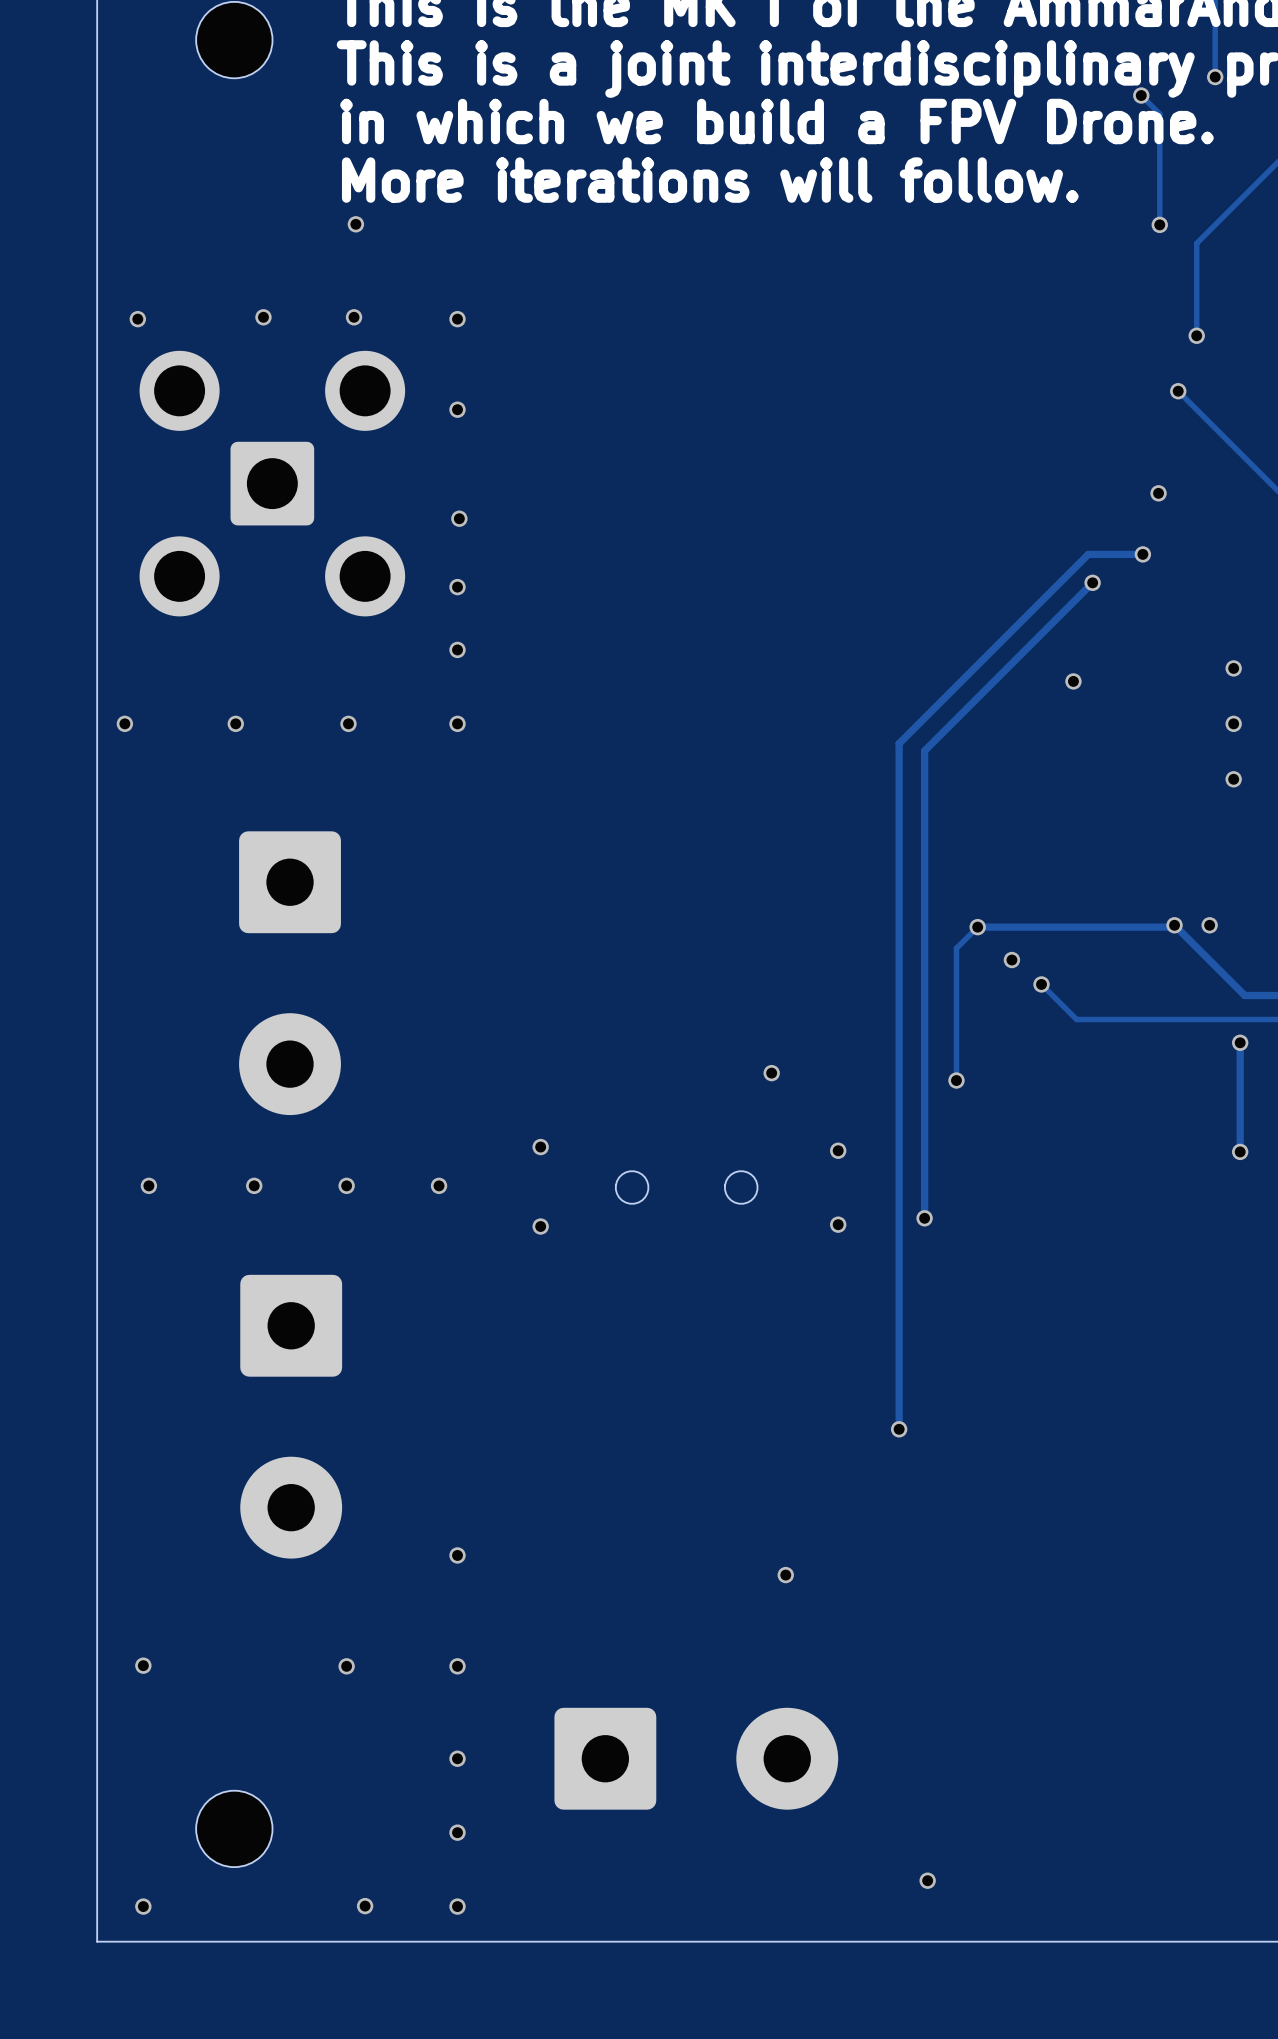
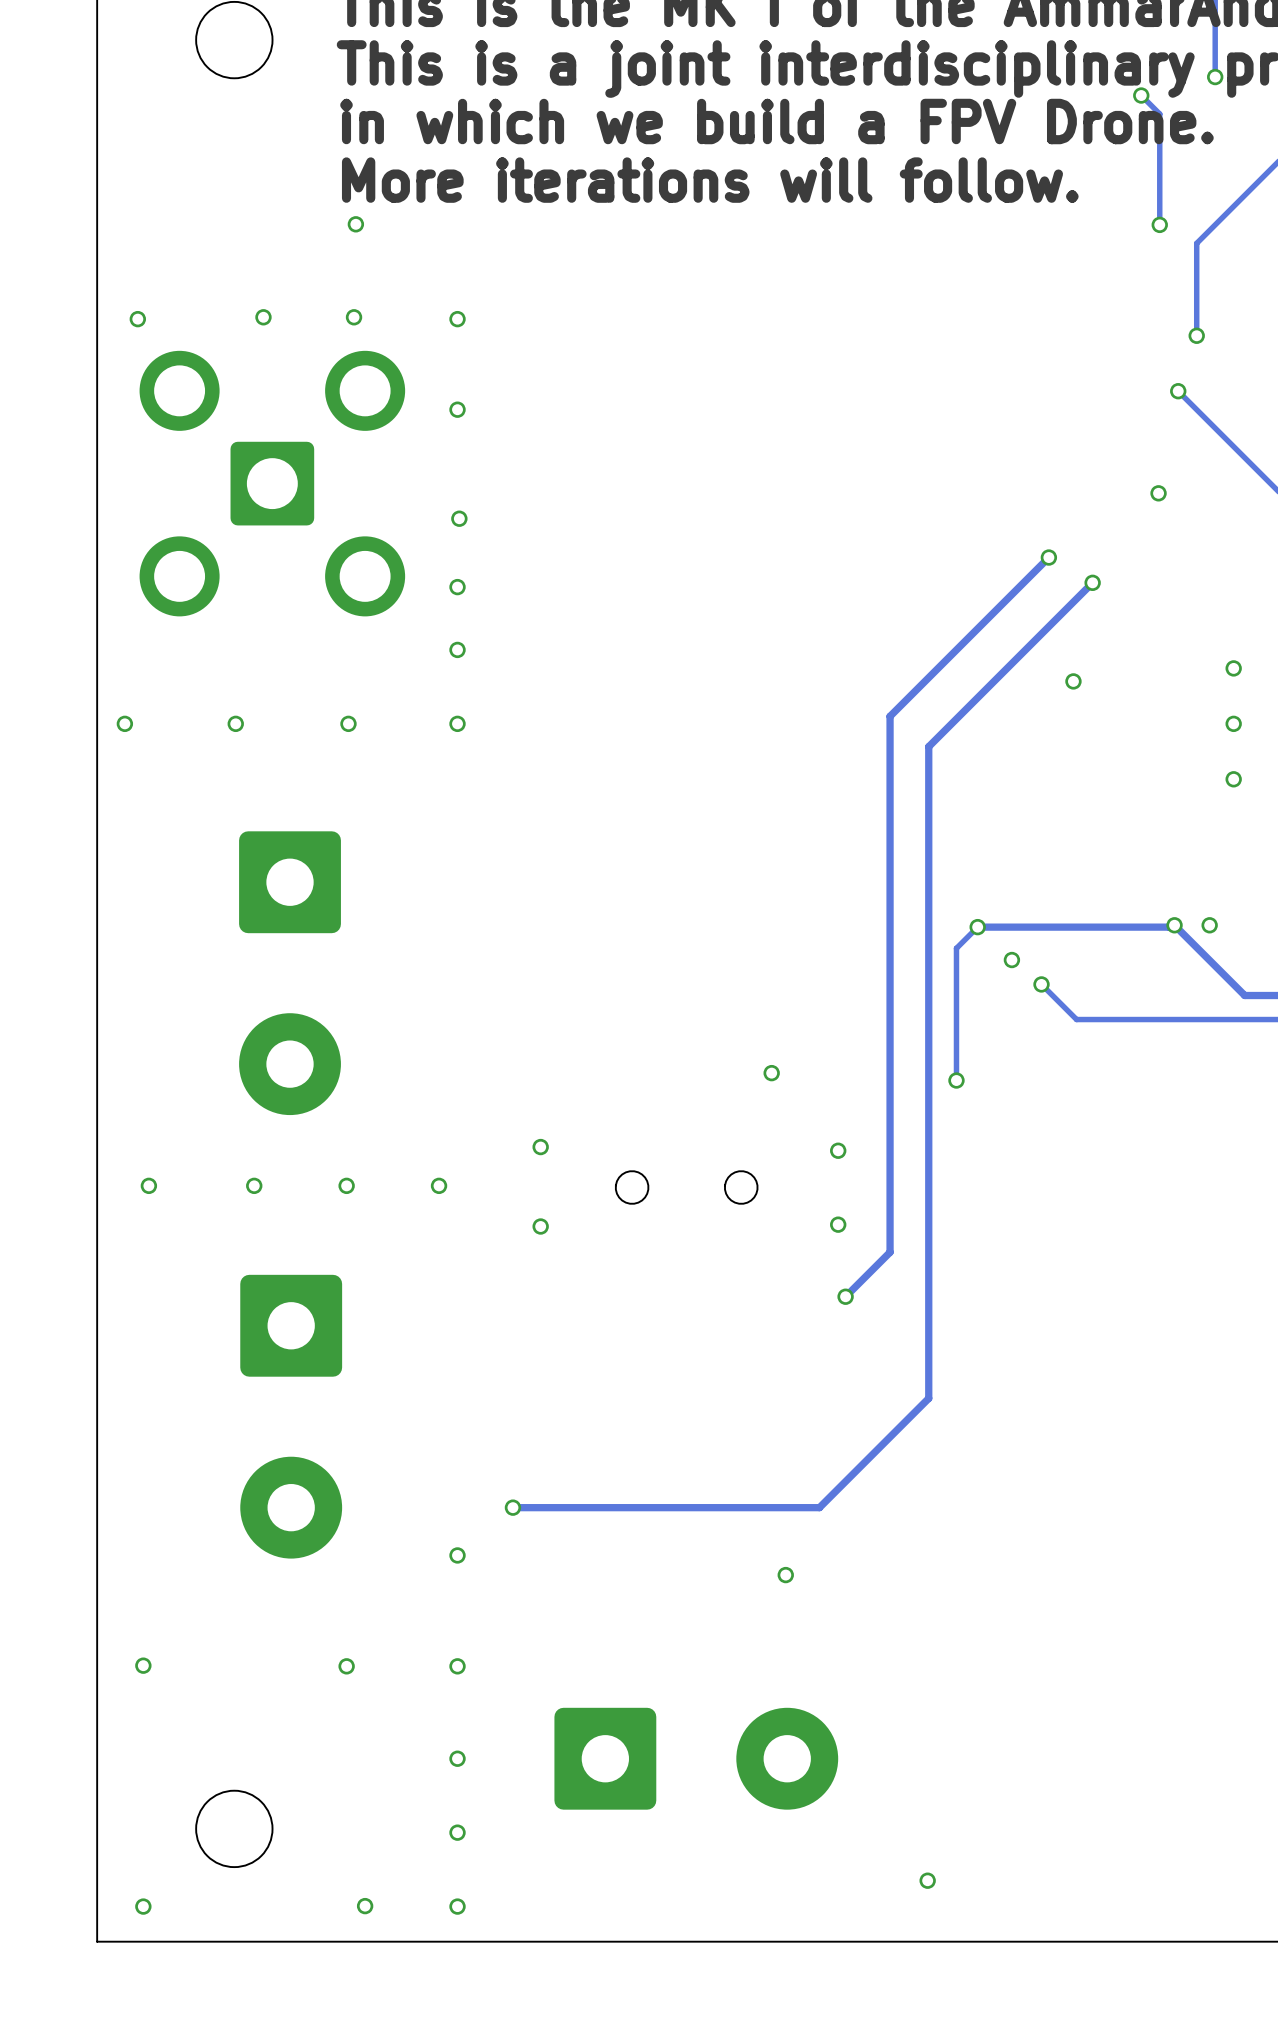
track: (1142, 554) (1088, 554) (899, 743) (899, 1429) -> none
via position: (1142, 554) -> (1048, 557)
track: none -> (1048, 557) (890, 716) (890, 1252) (845, 1296)
track: (928, 746) (924, 750) (924, 1218) -> (928, 746) (928, 1398) (819, 1507) (512, 1507)
track: (1240, 1042) (1240, 1151) -> none
via: (1240, 1042) -> none
via: (1240, 1151) -> none
via: (924, 1218) -> none
via: none -> (845, 1296)
via: (899, 1429) -> none
via: none -> (512, 1507)

